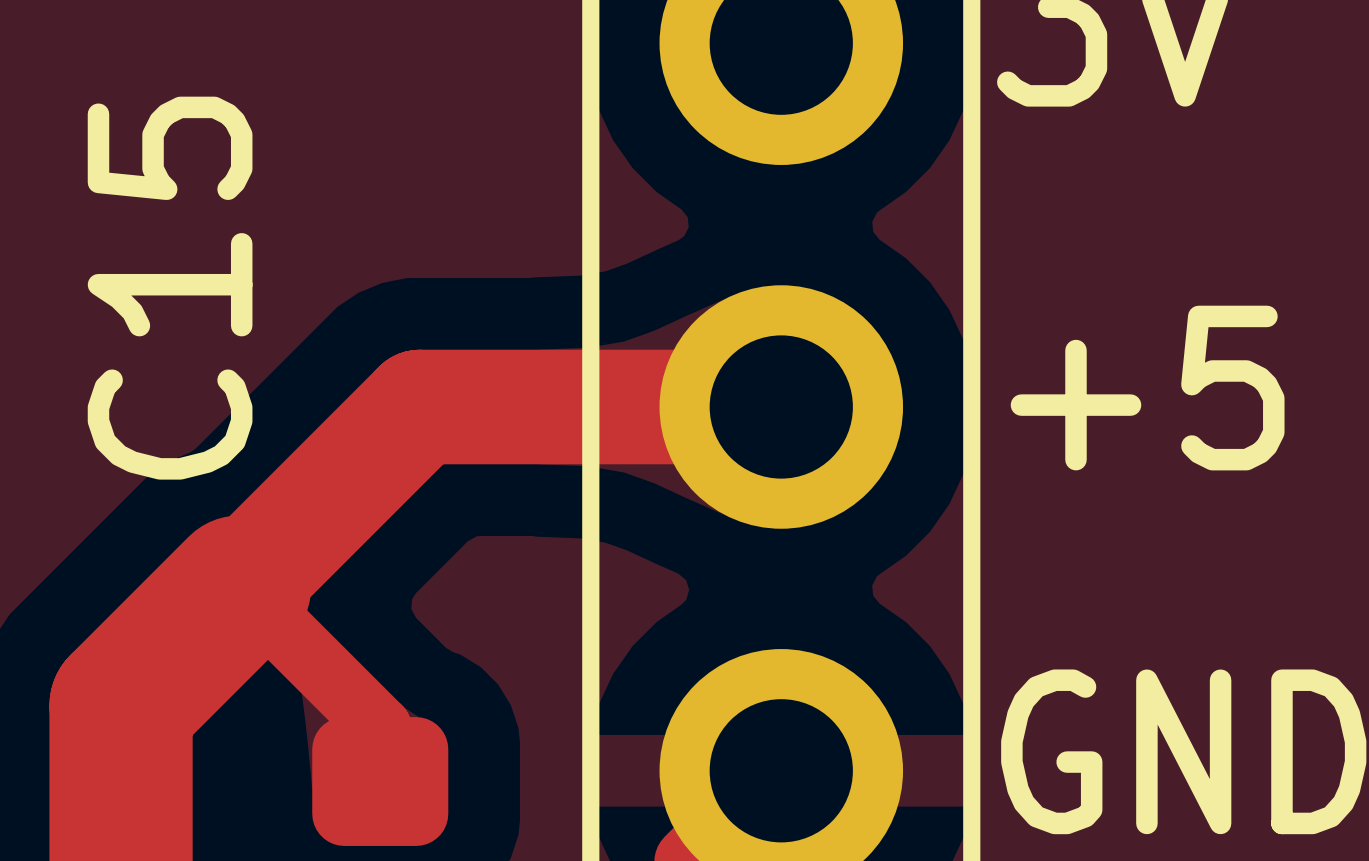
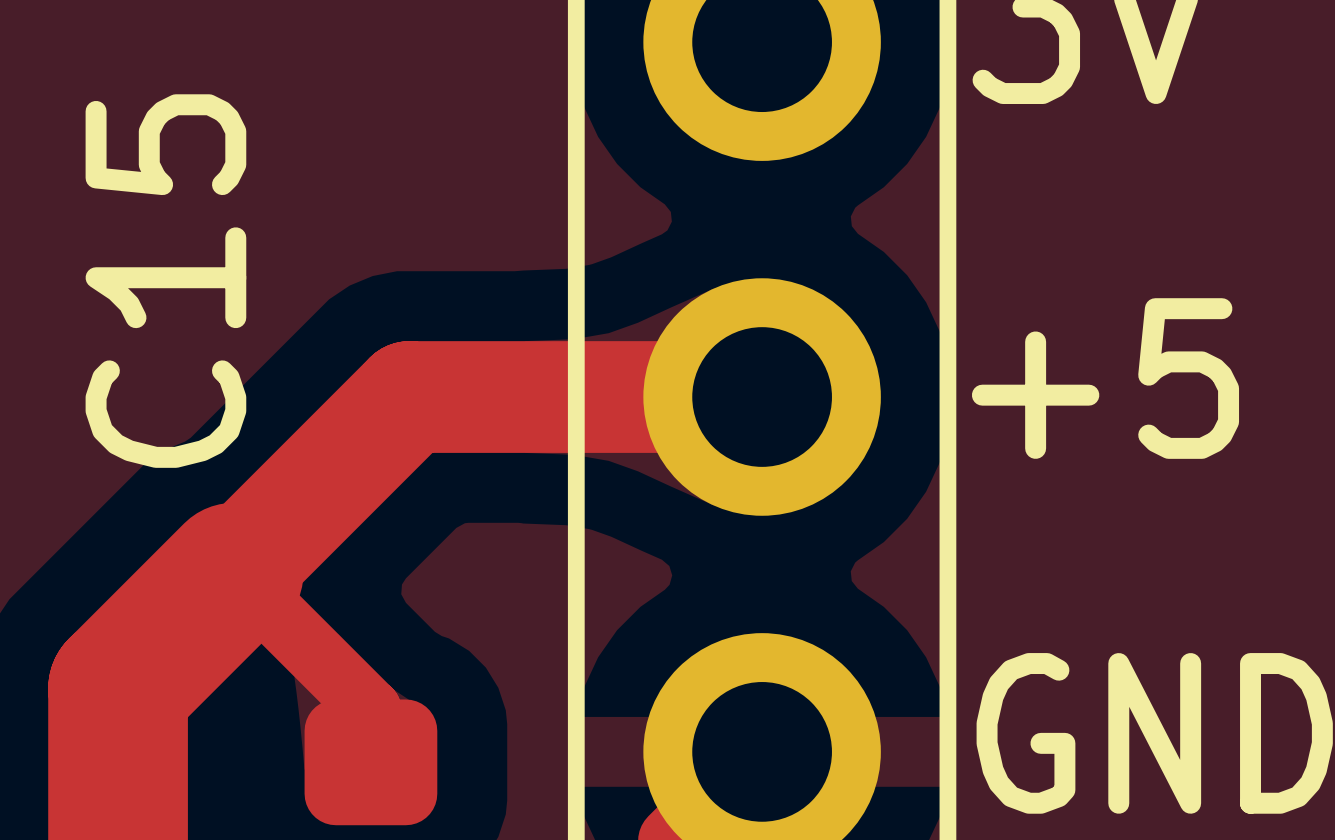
text position: +5 (1147, 388) -> +5 (1105, 378)

